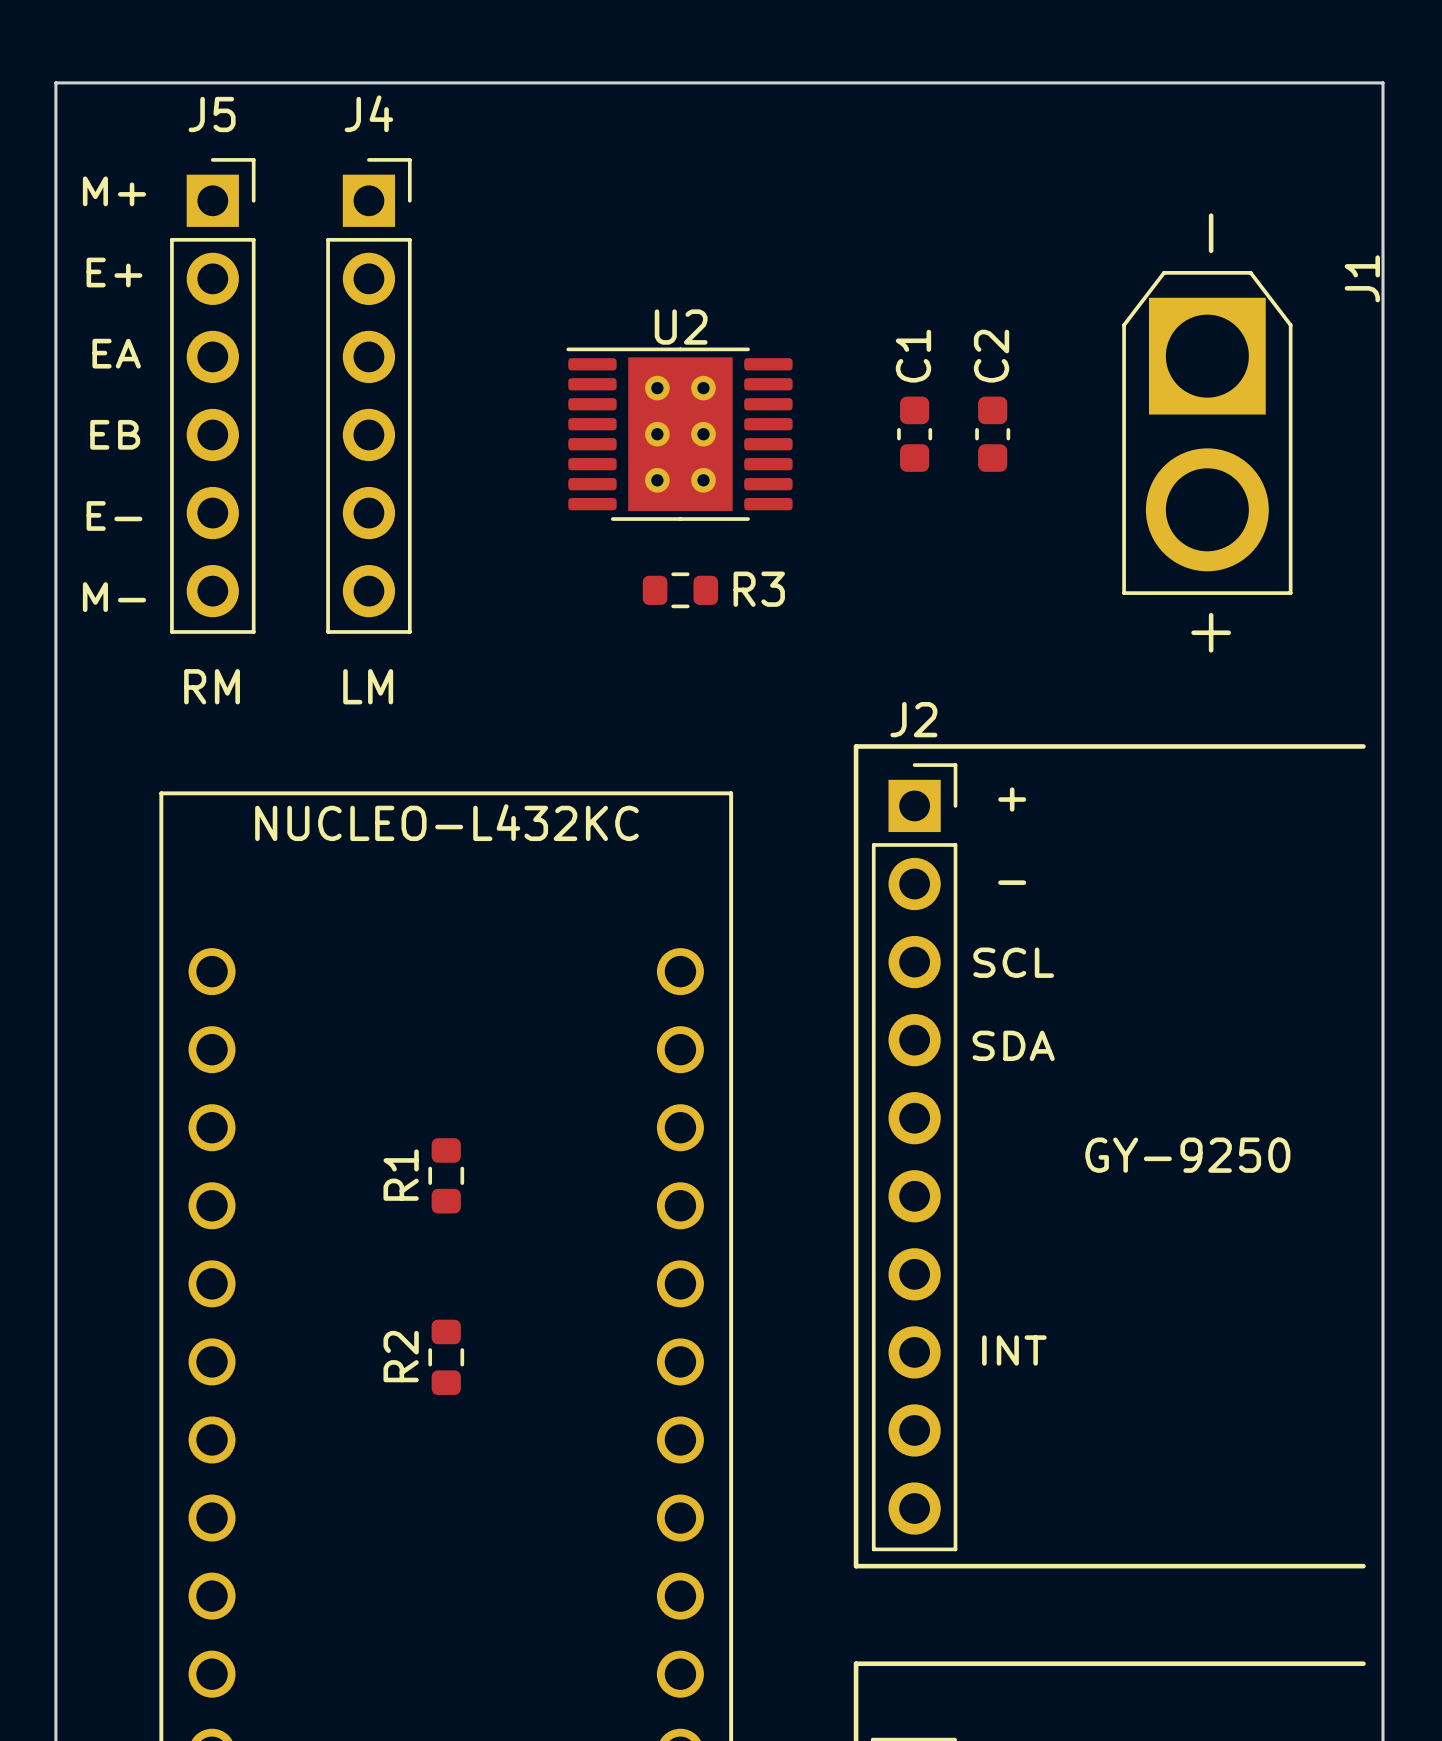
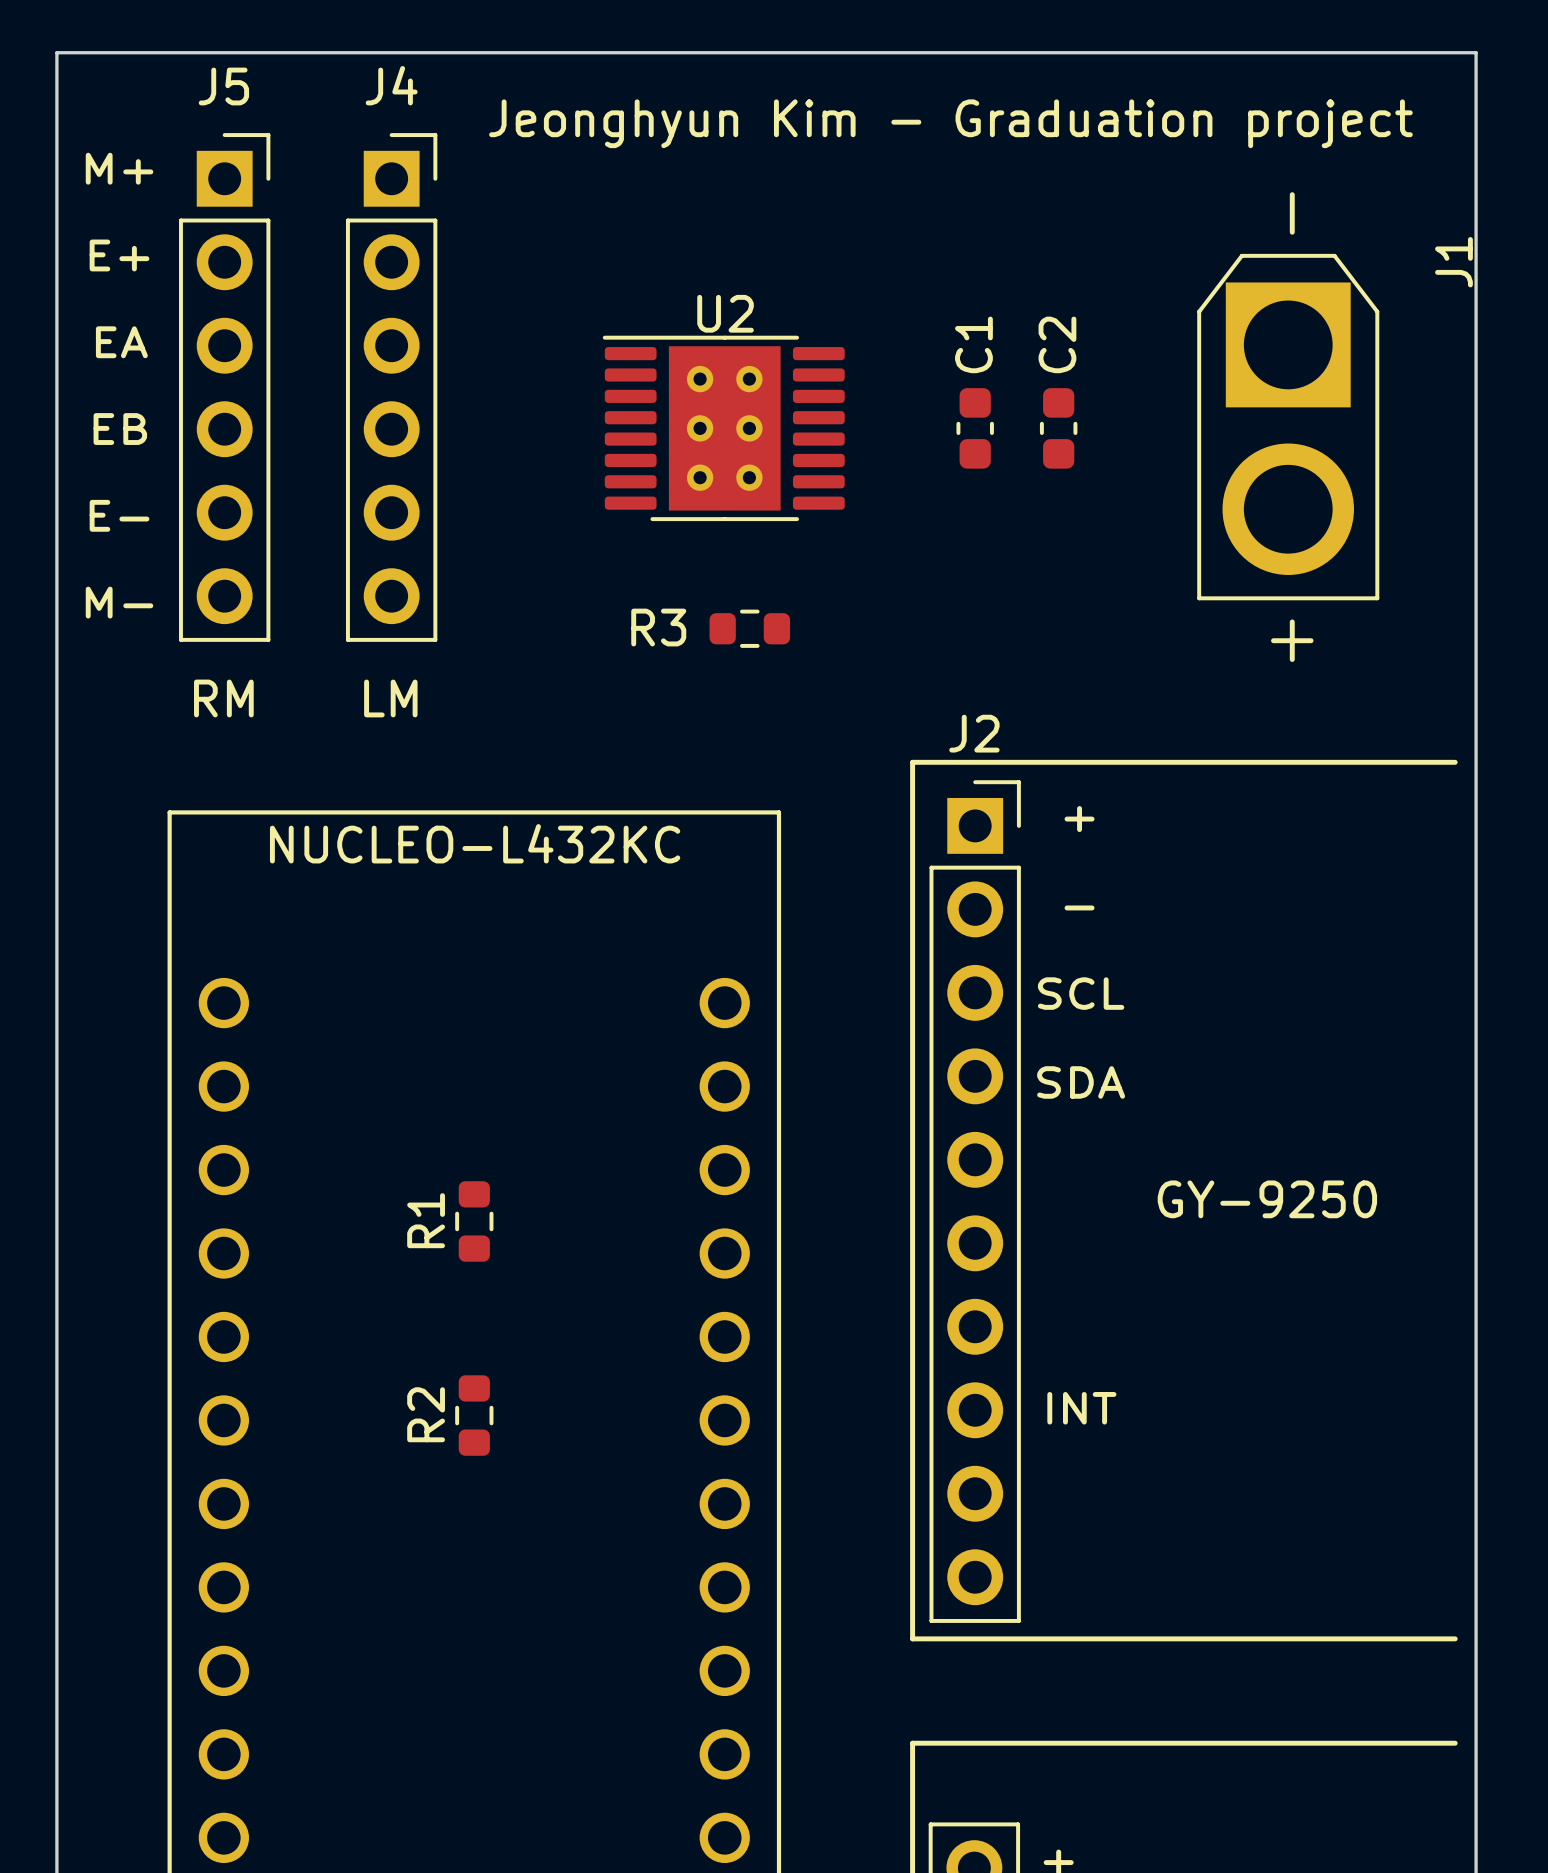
text: none -> Jeonghyun Kim - Graduation project (950, 123)
R3 name position: R3 (759, 589) -> R3 (658, 627)
R3 position: (680, 590) -> (749, 628)

